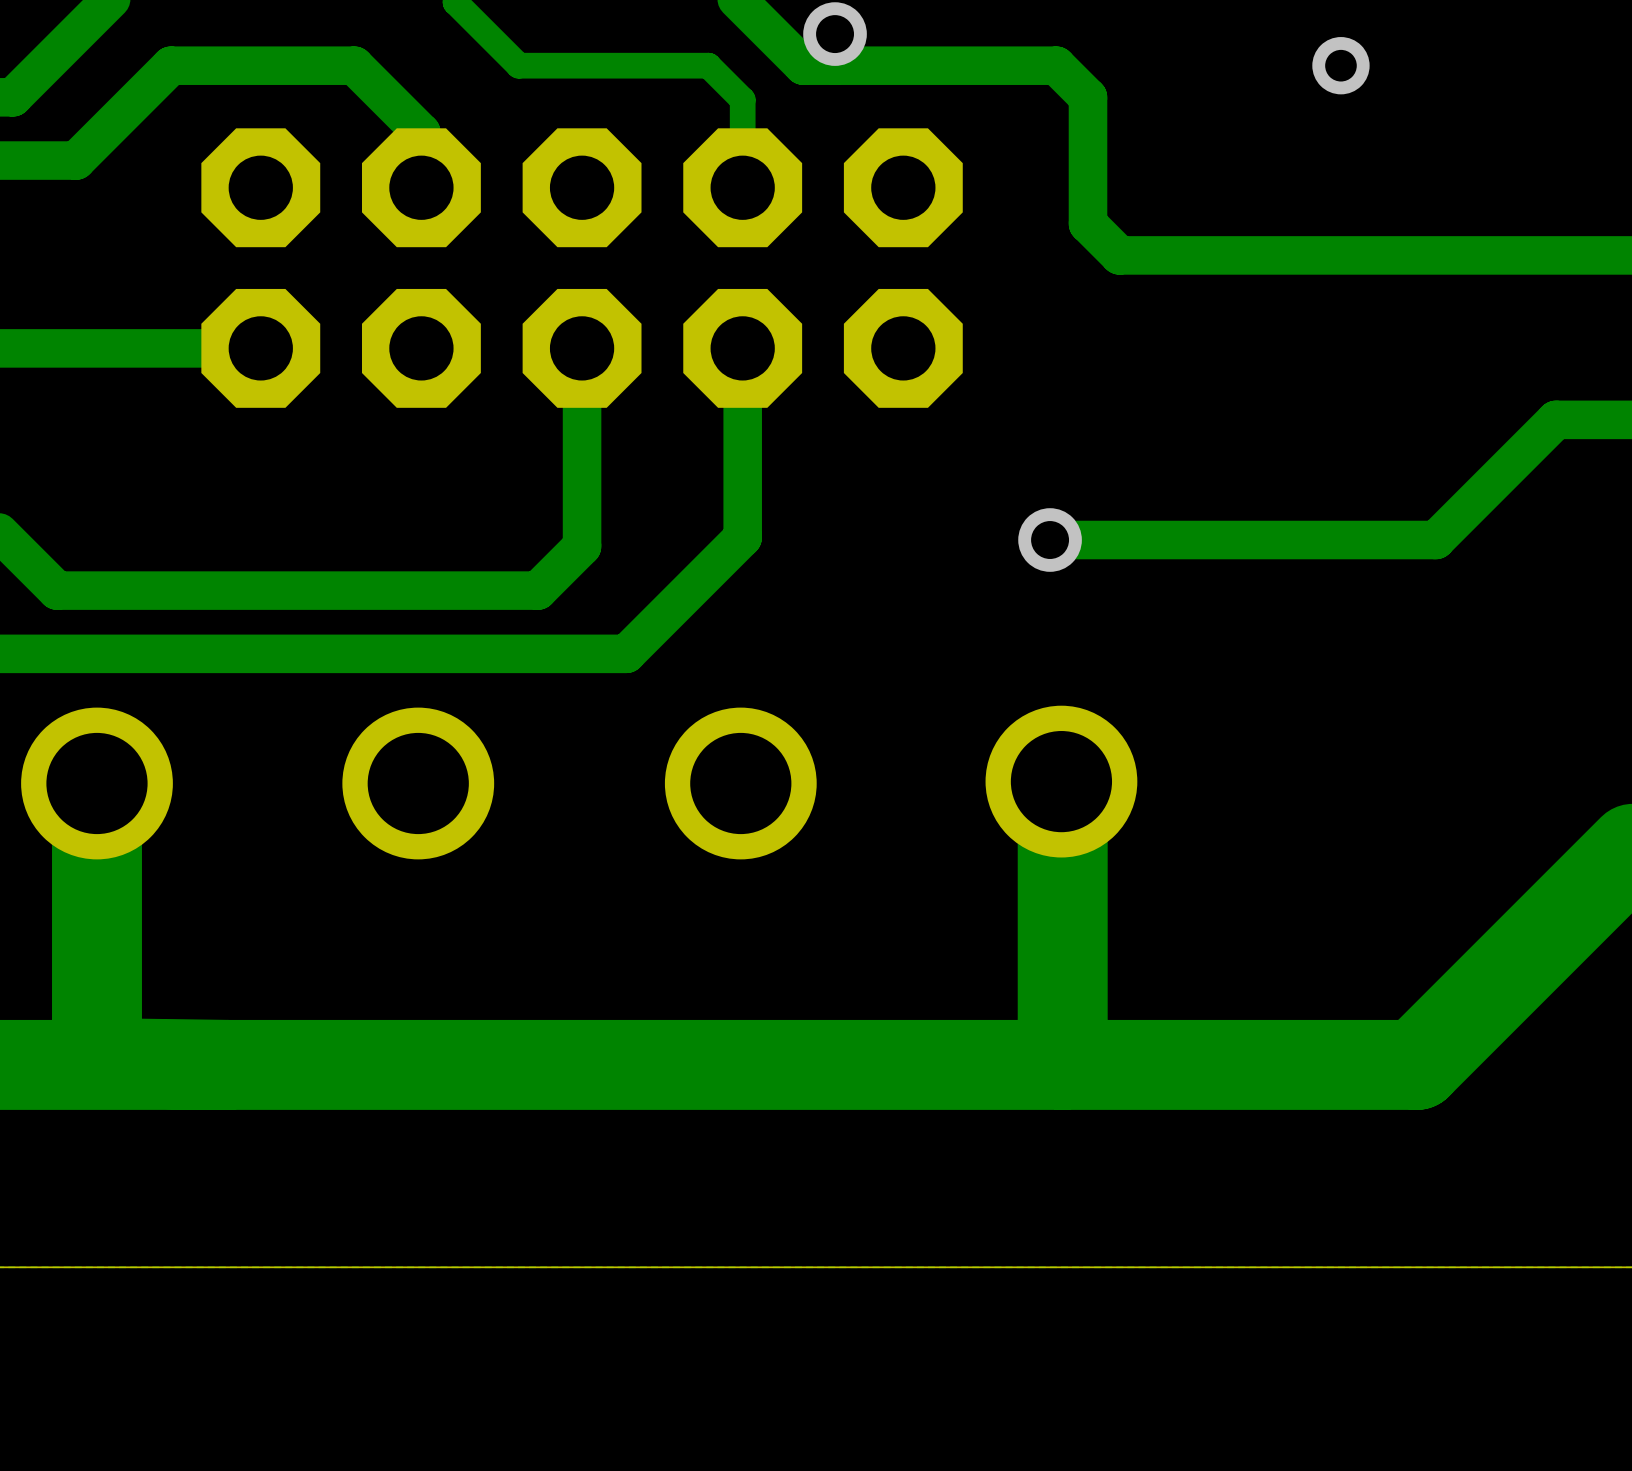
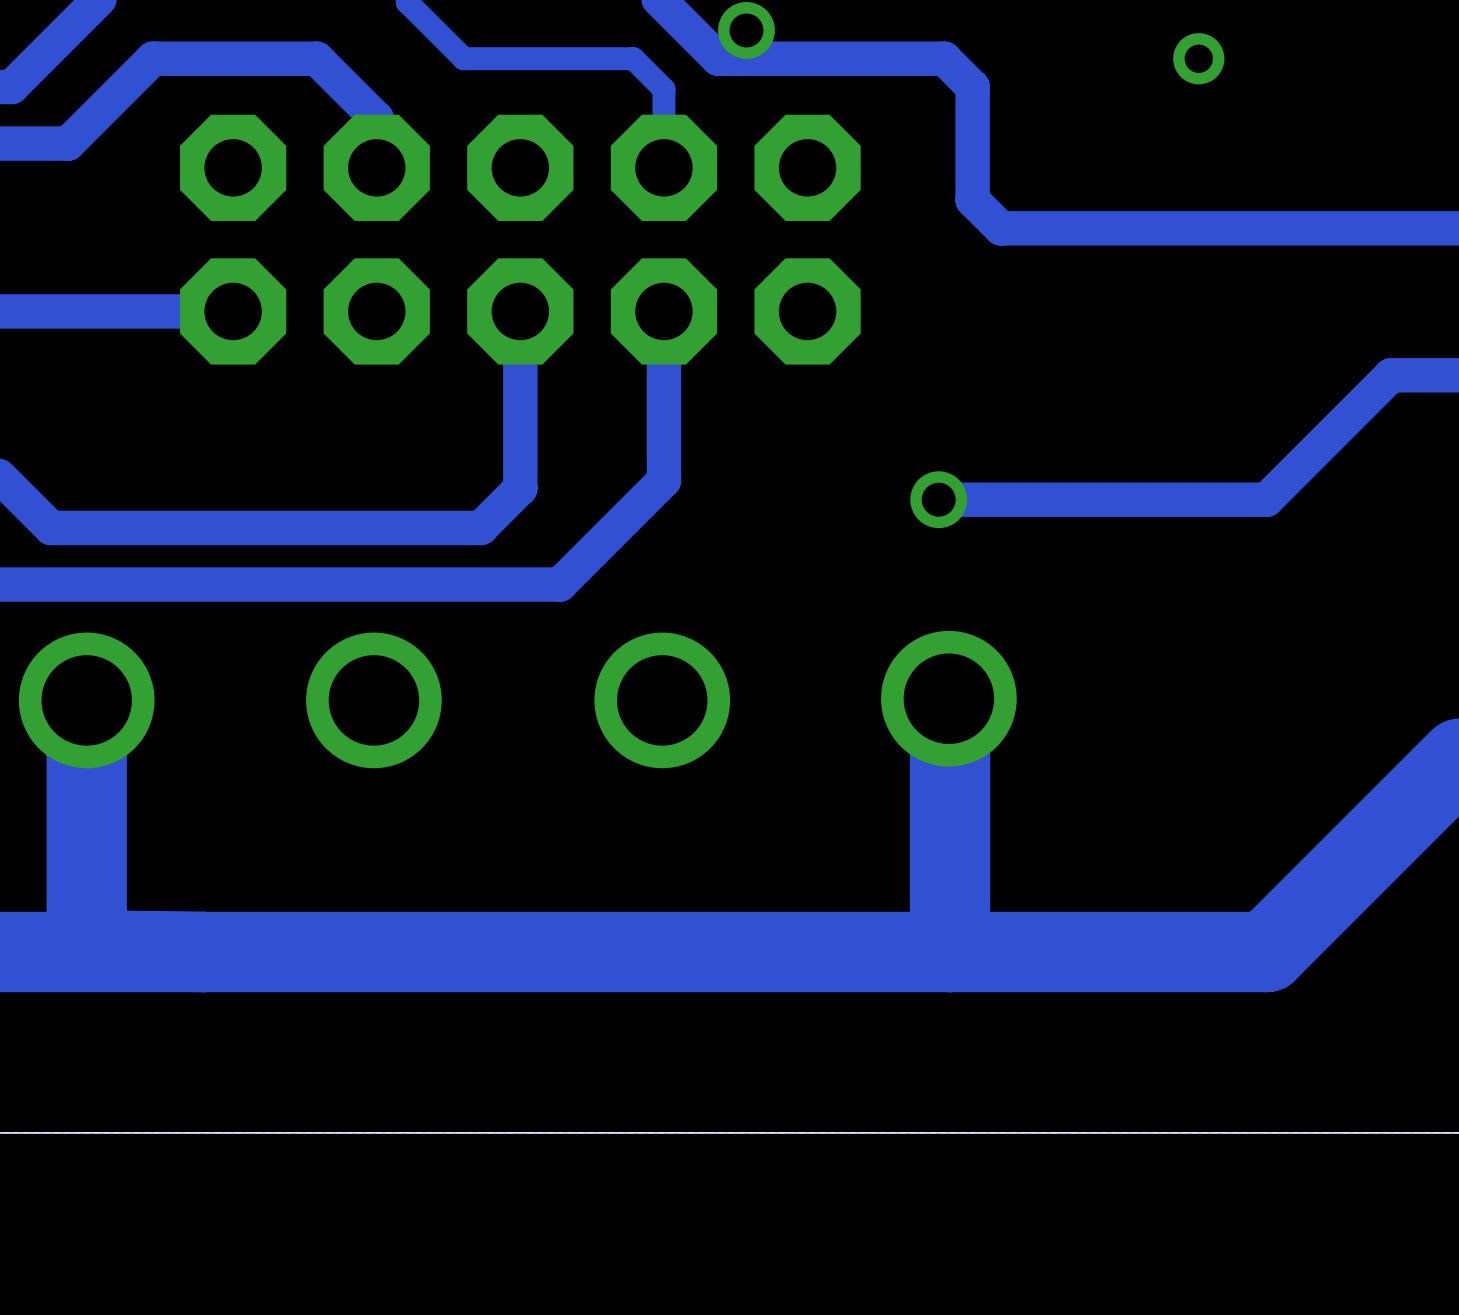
via position: (1050, 540) -> (938, 499)
track: (1435, 540) (1050, 540) -> (1283, 482) (1266, 499) (938, 499)

